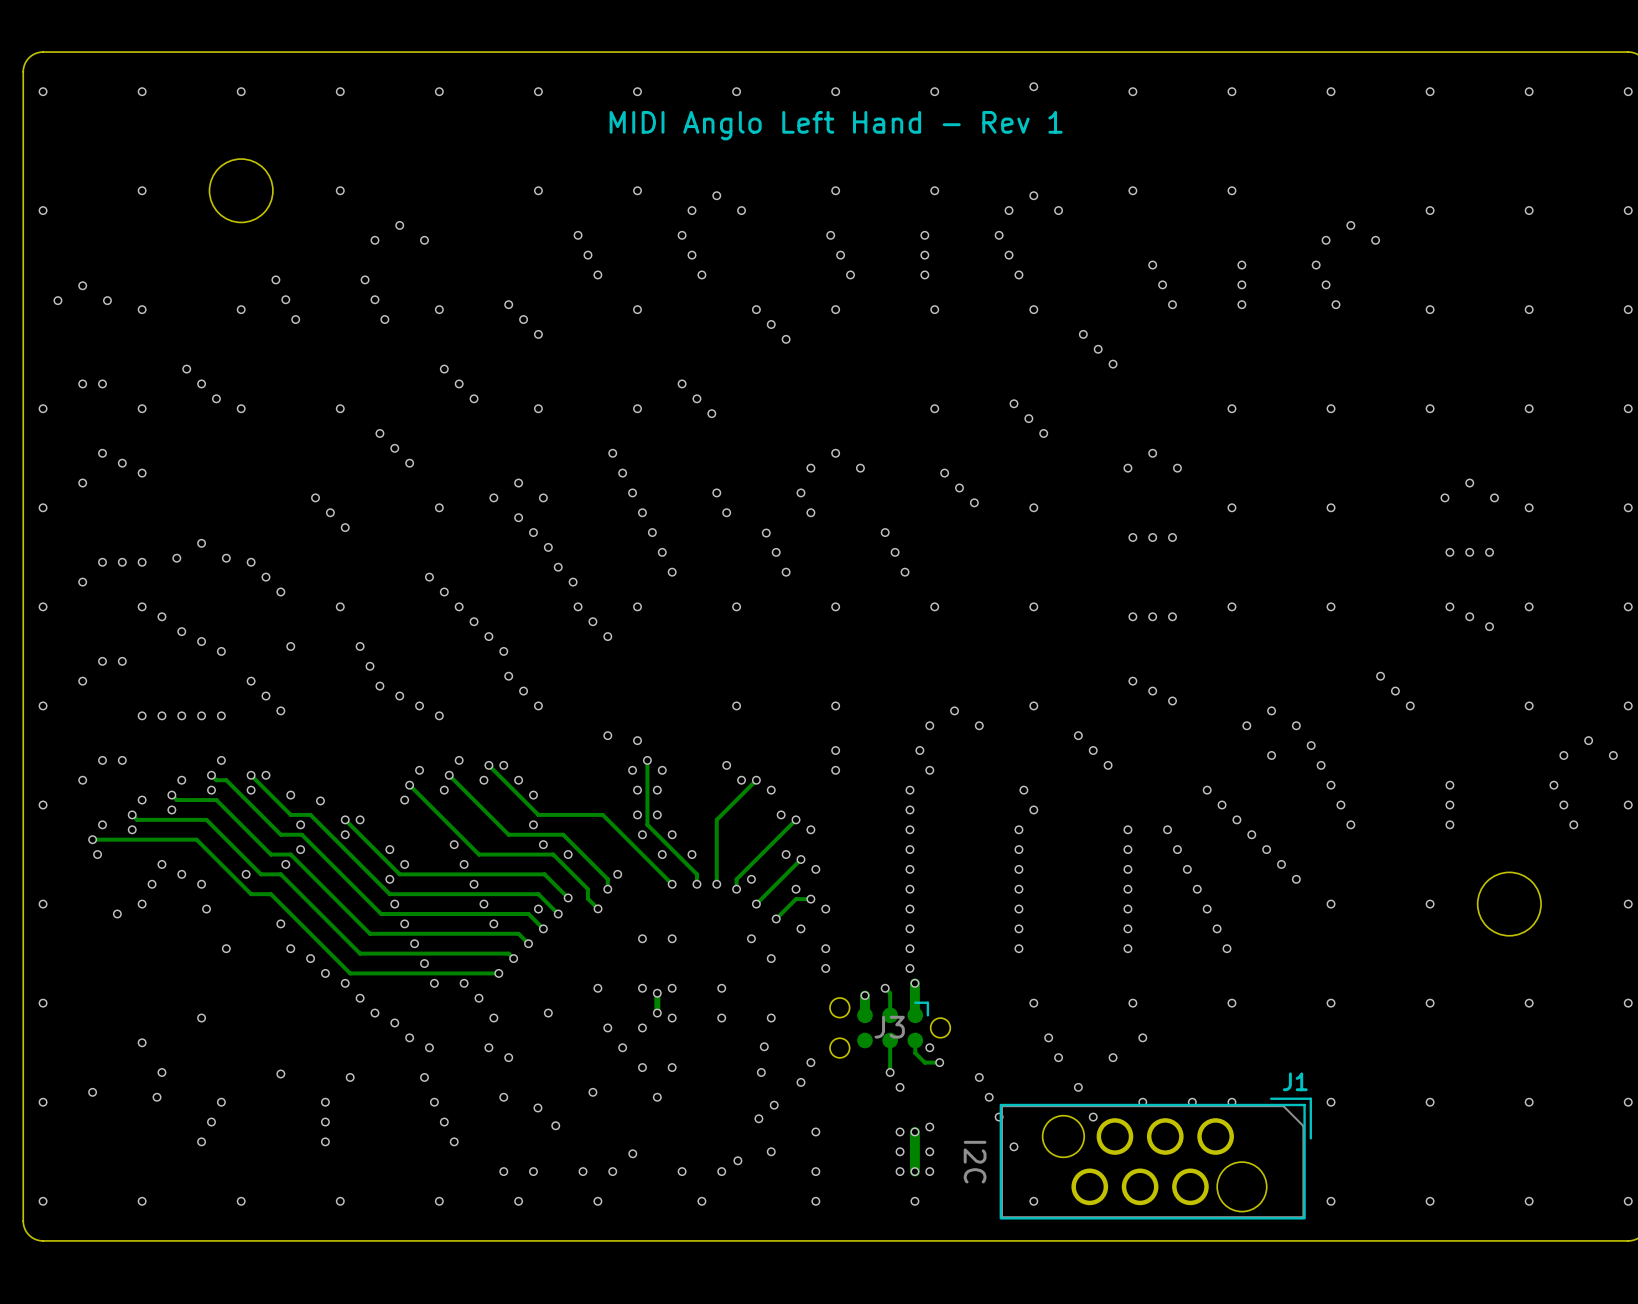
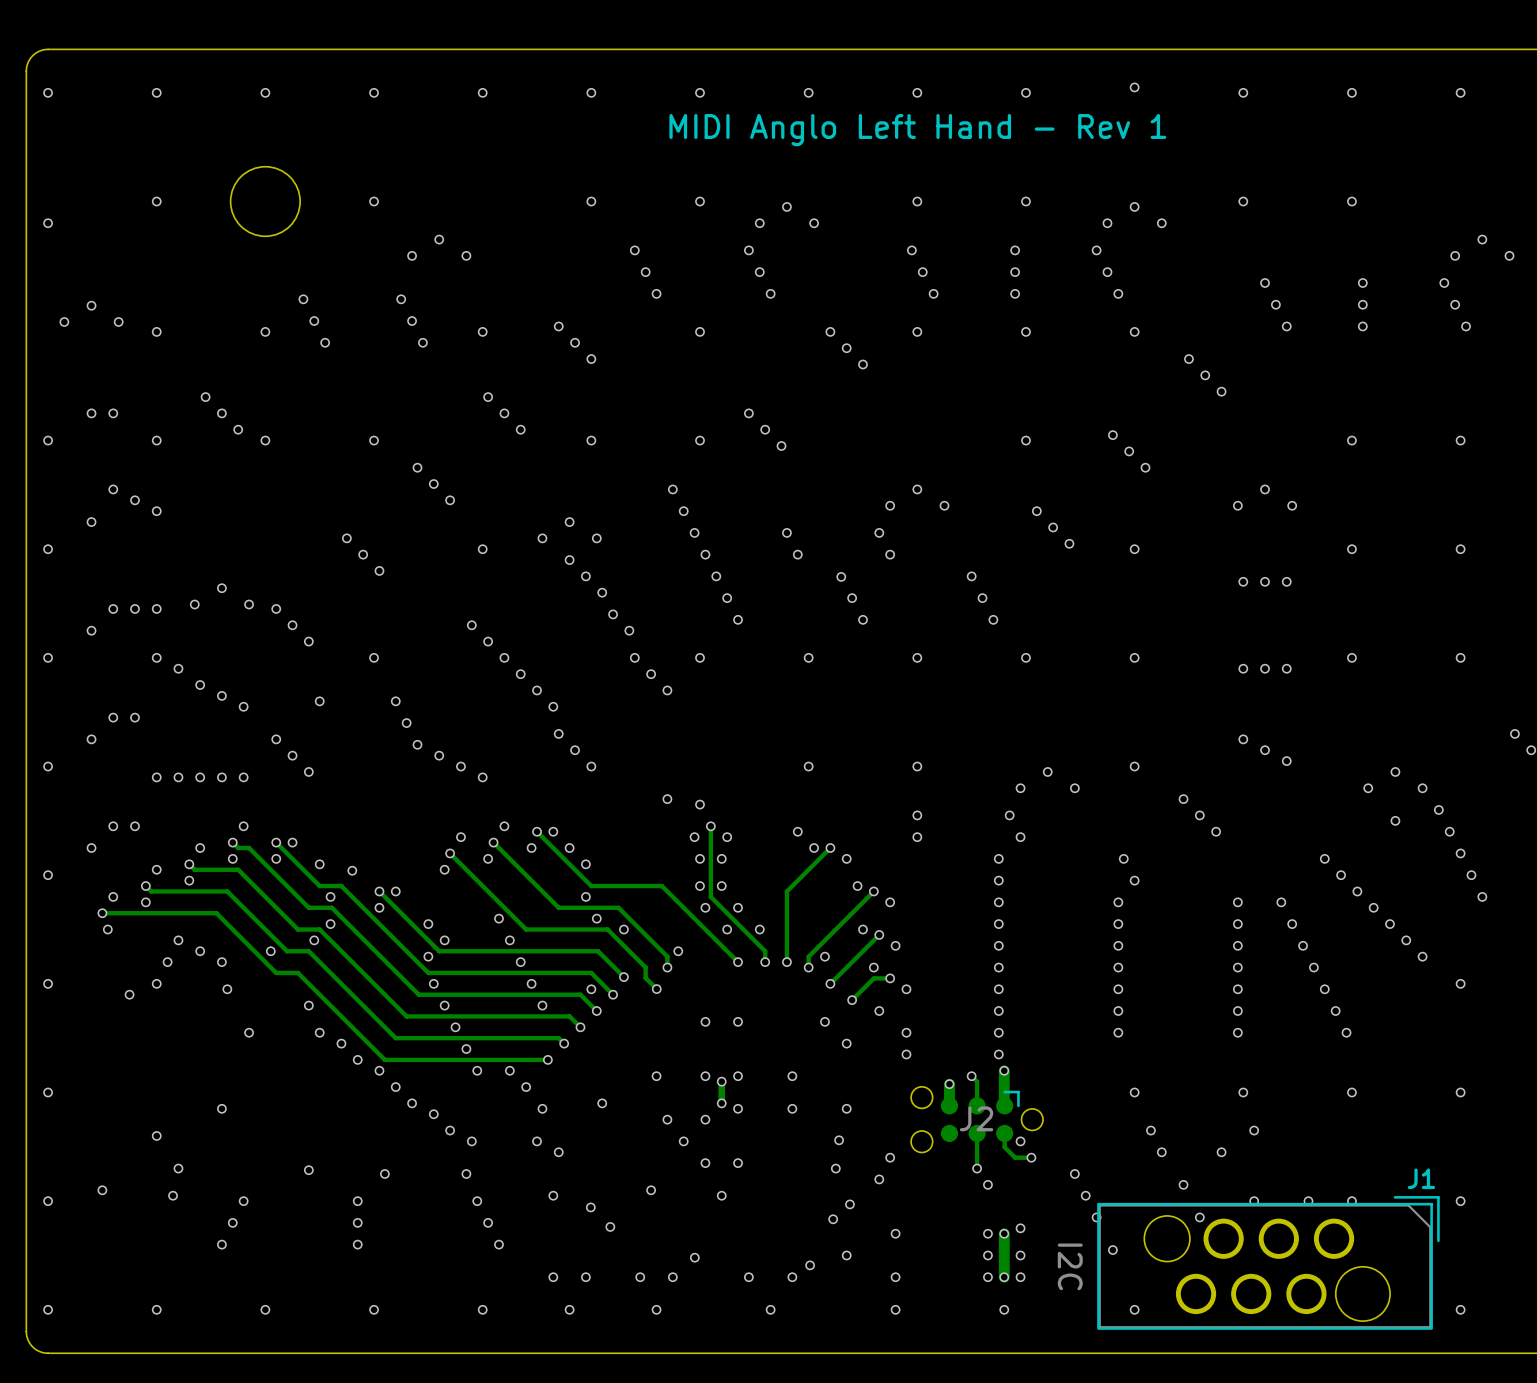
J3 name: J3 (889, 1027) -> J2 (976, 1118)

